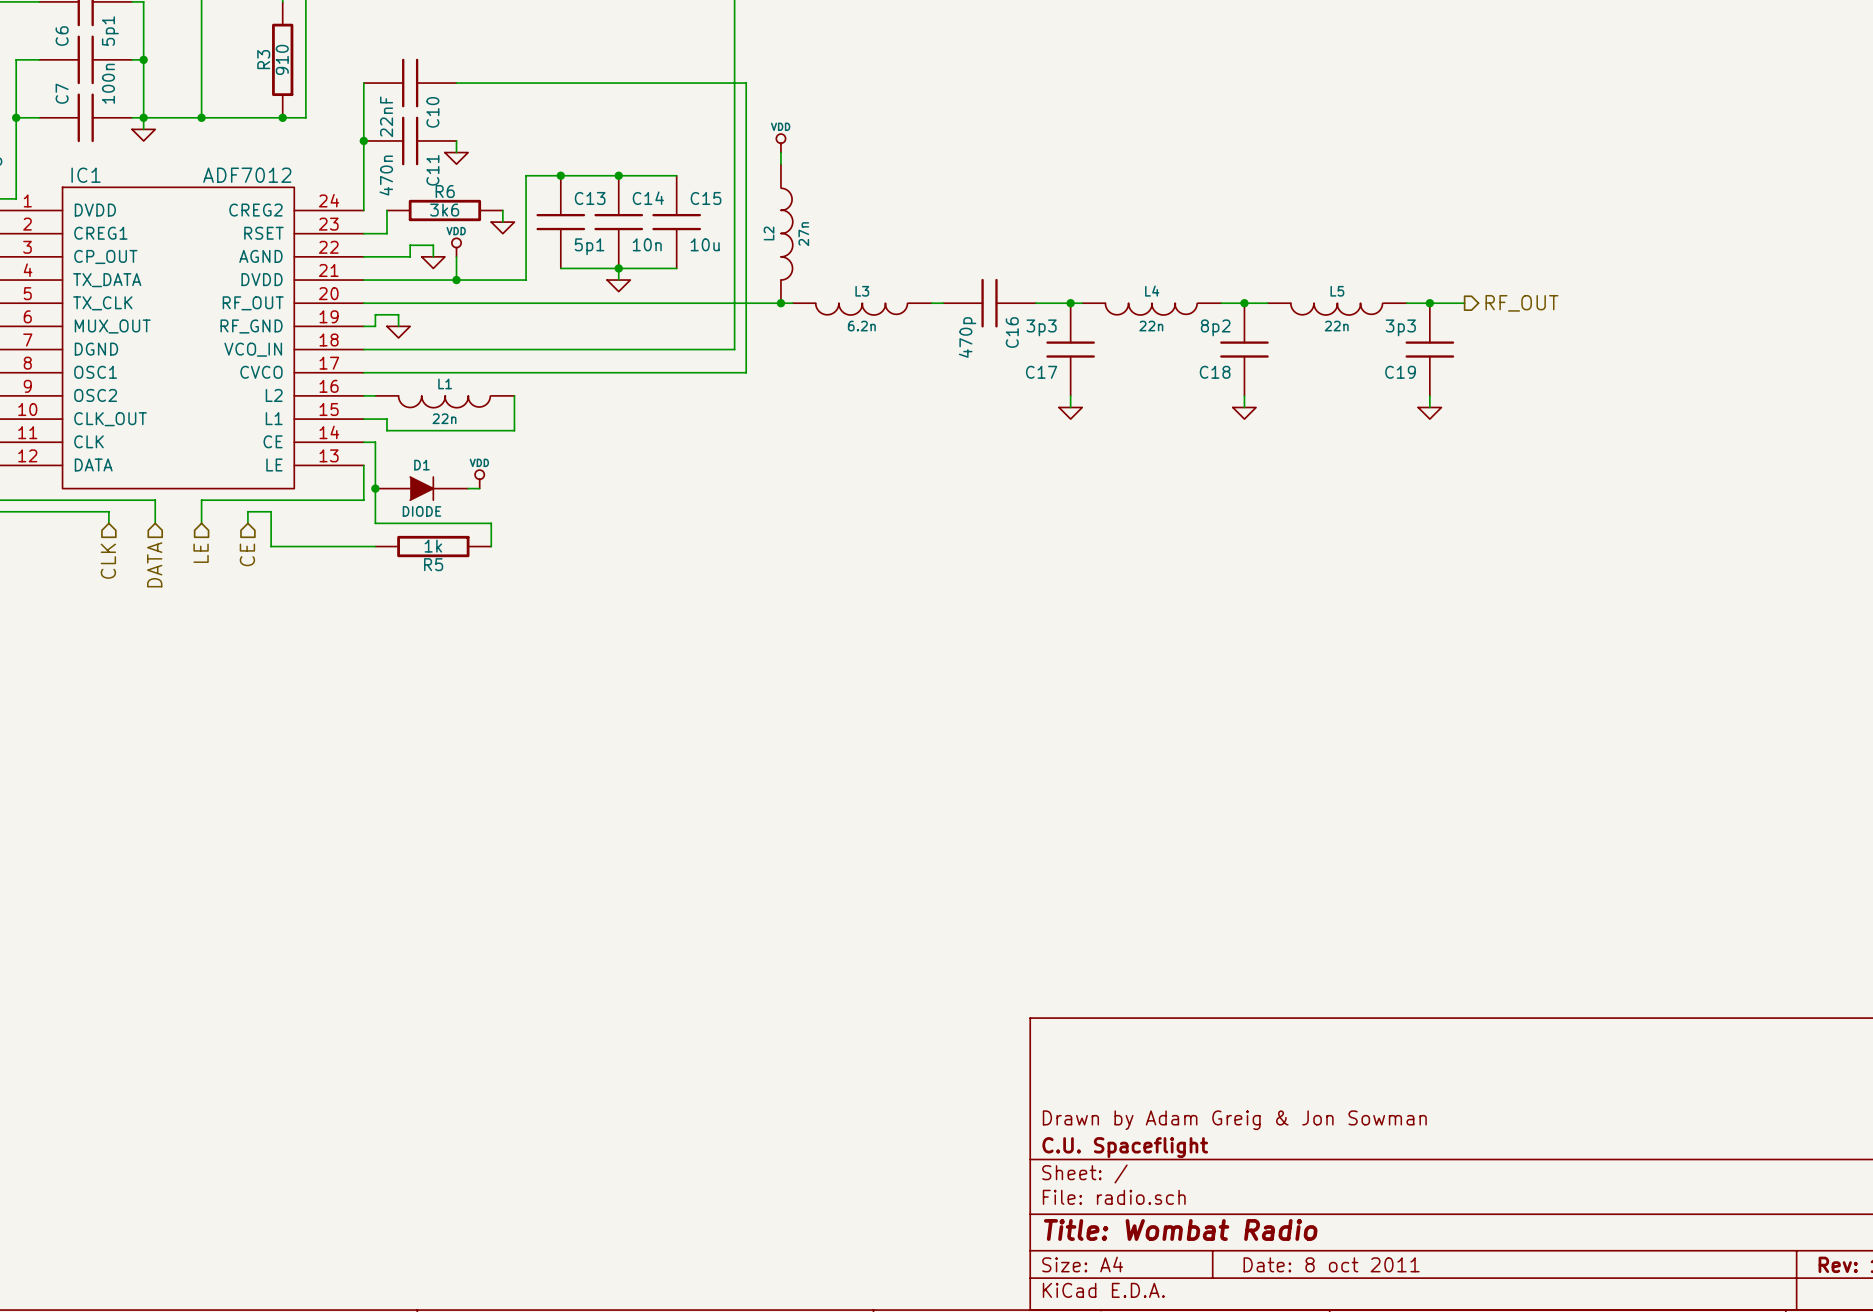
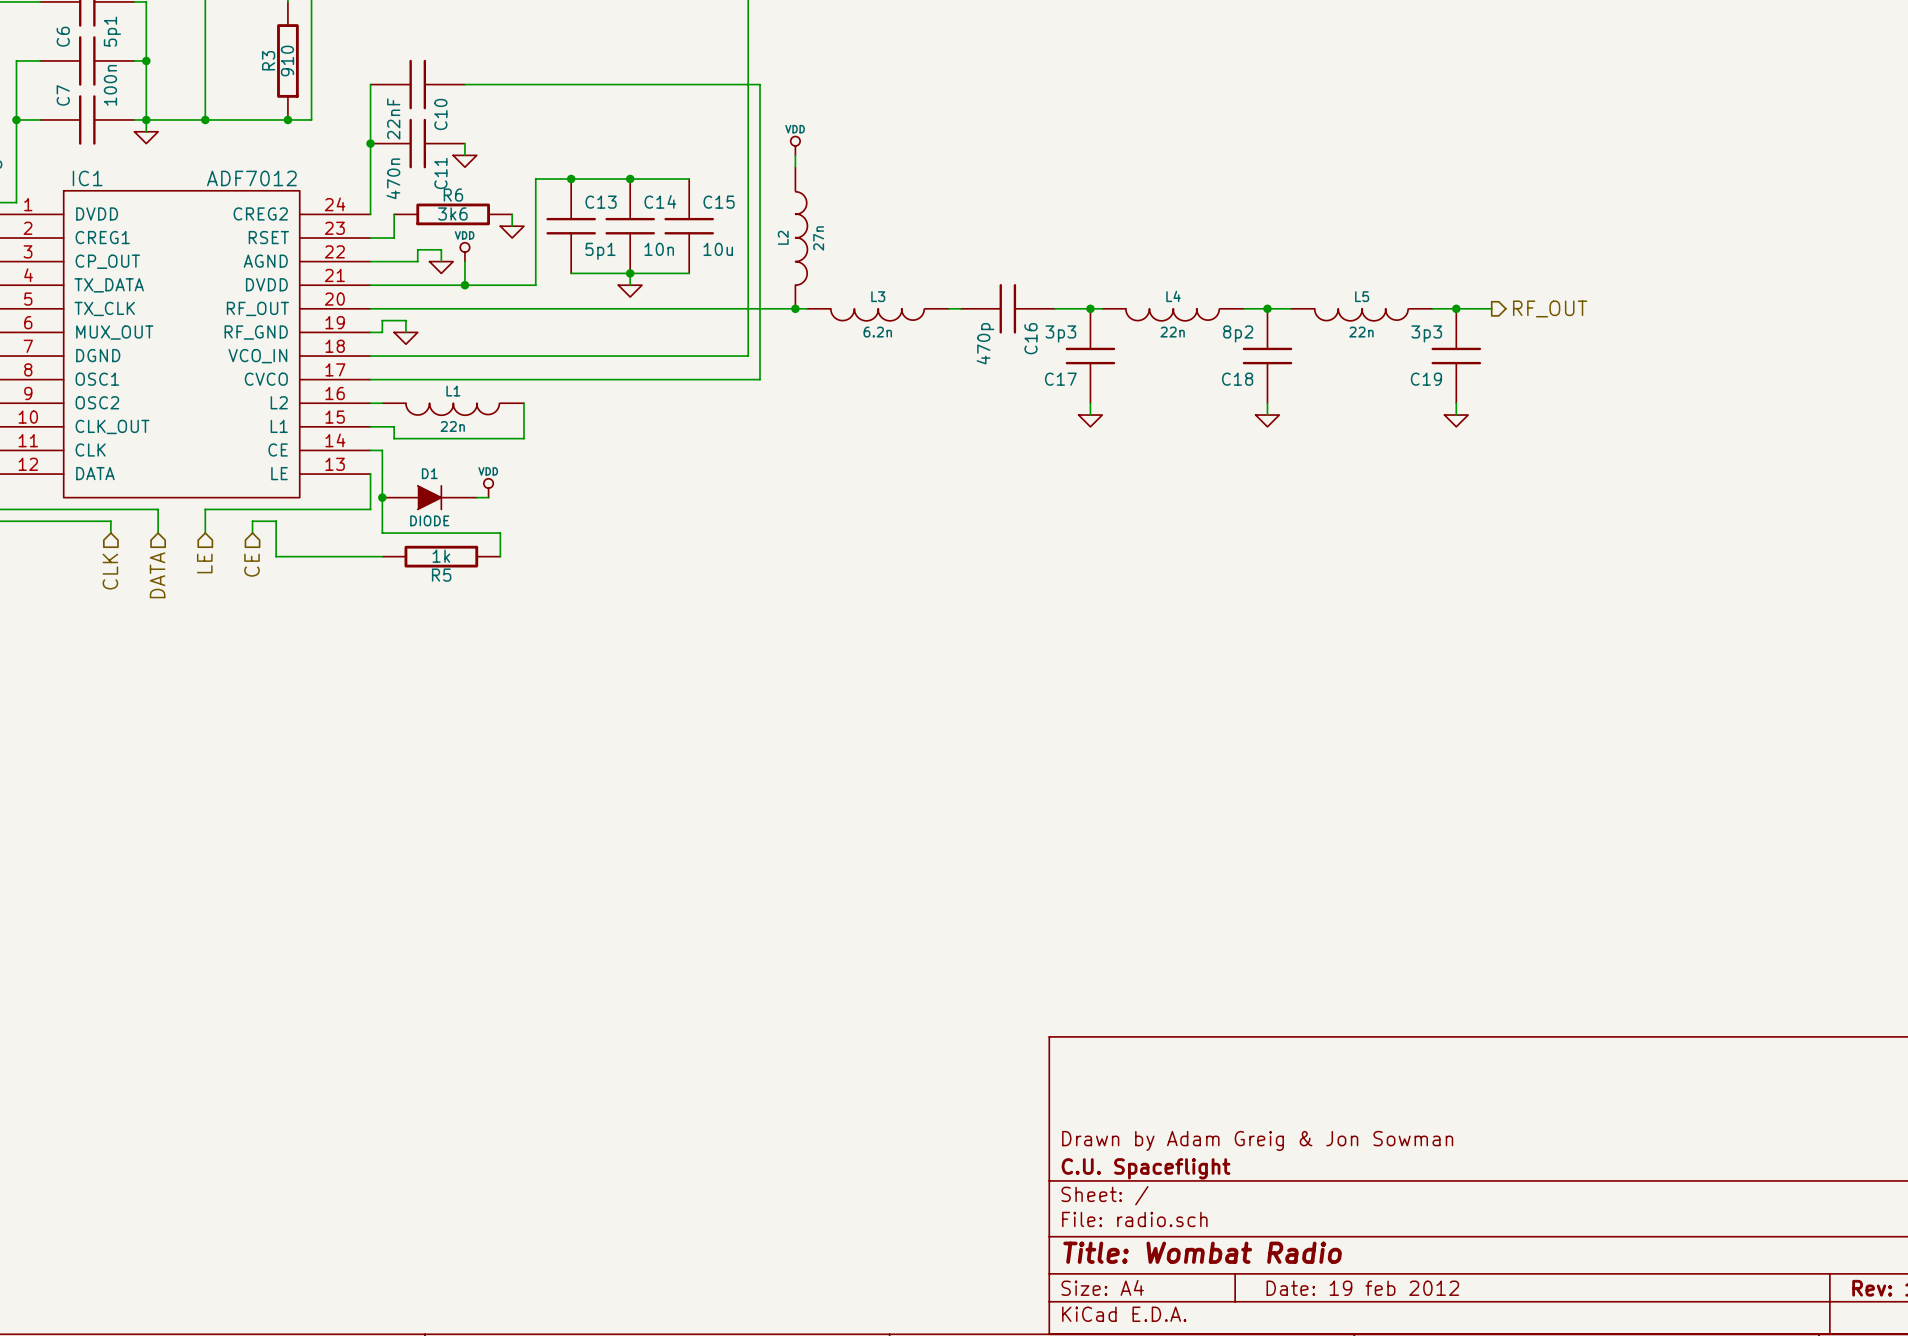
title block: Date: 8 oct 2011 (1331, 1264) -> Date: 19 feb 2012 (1362, 1288)

